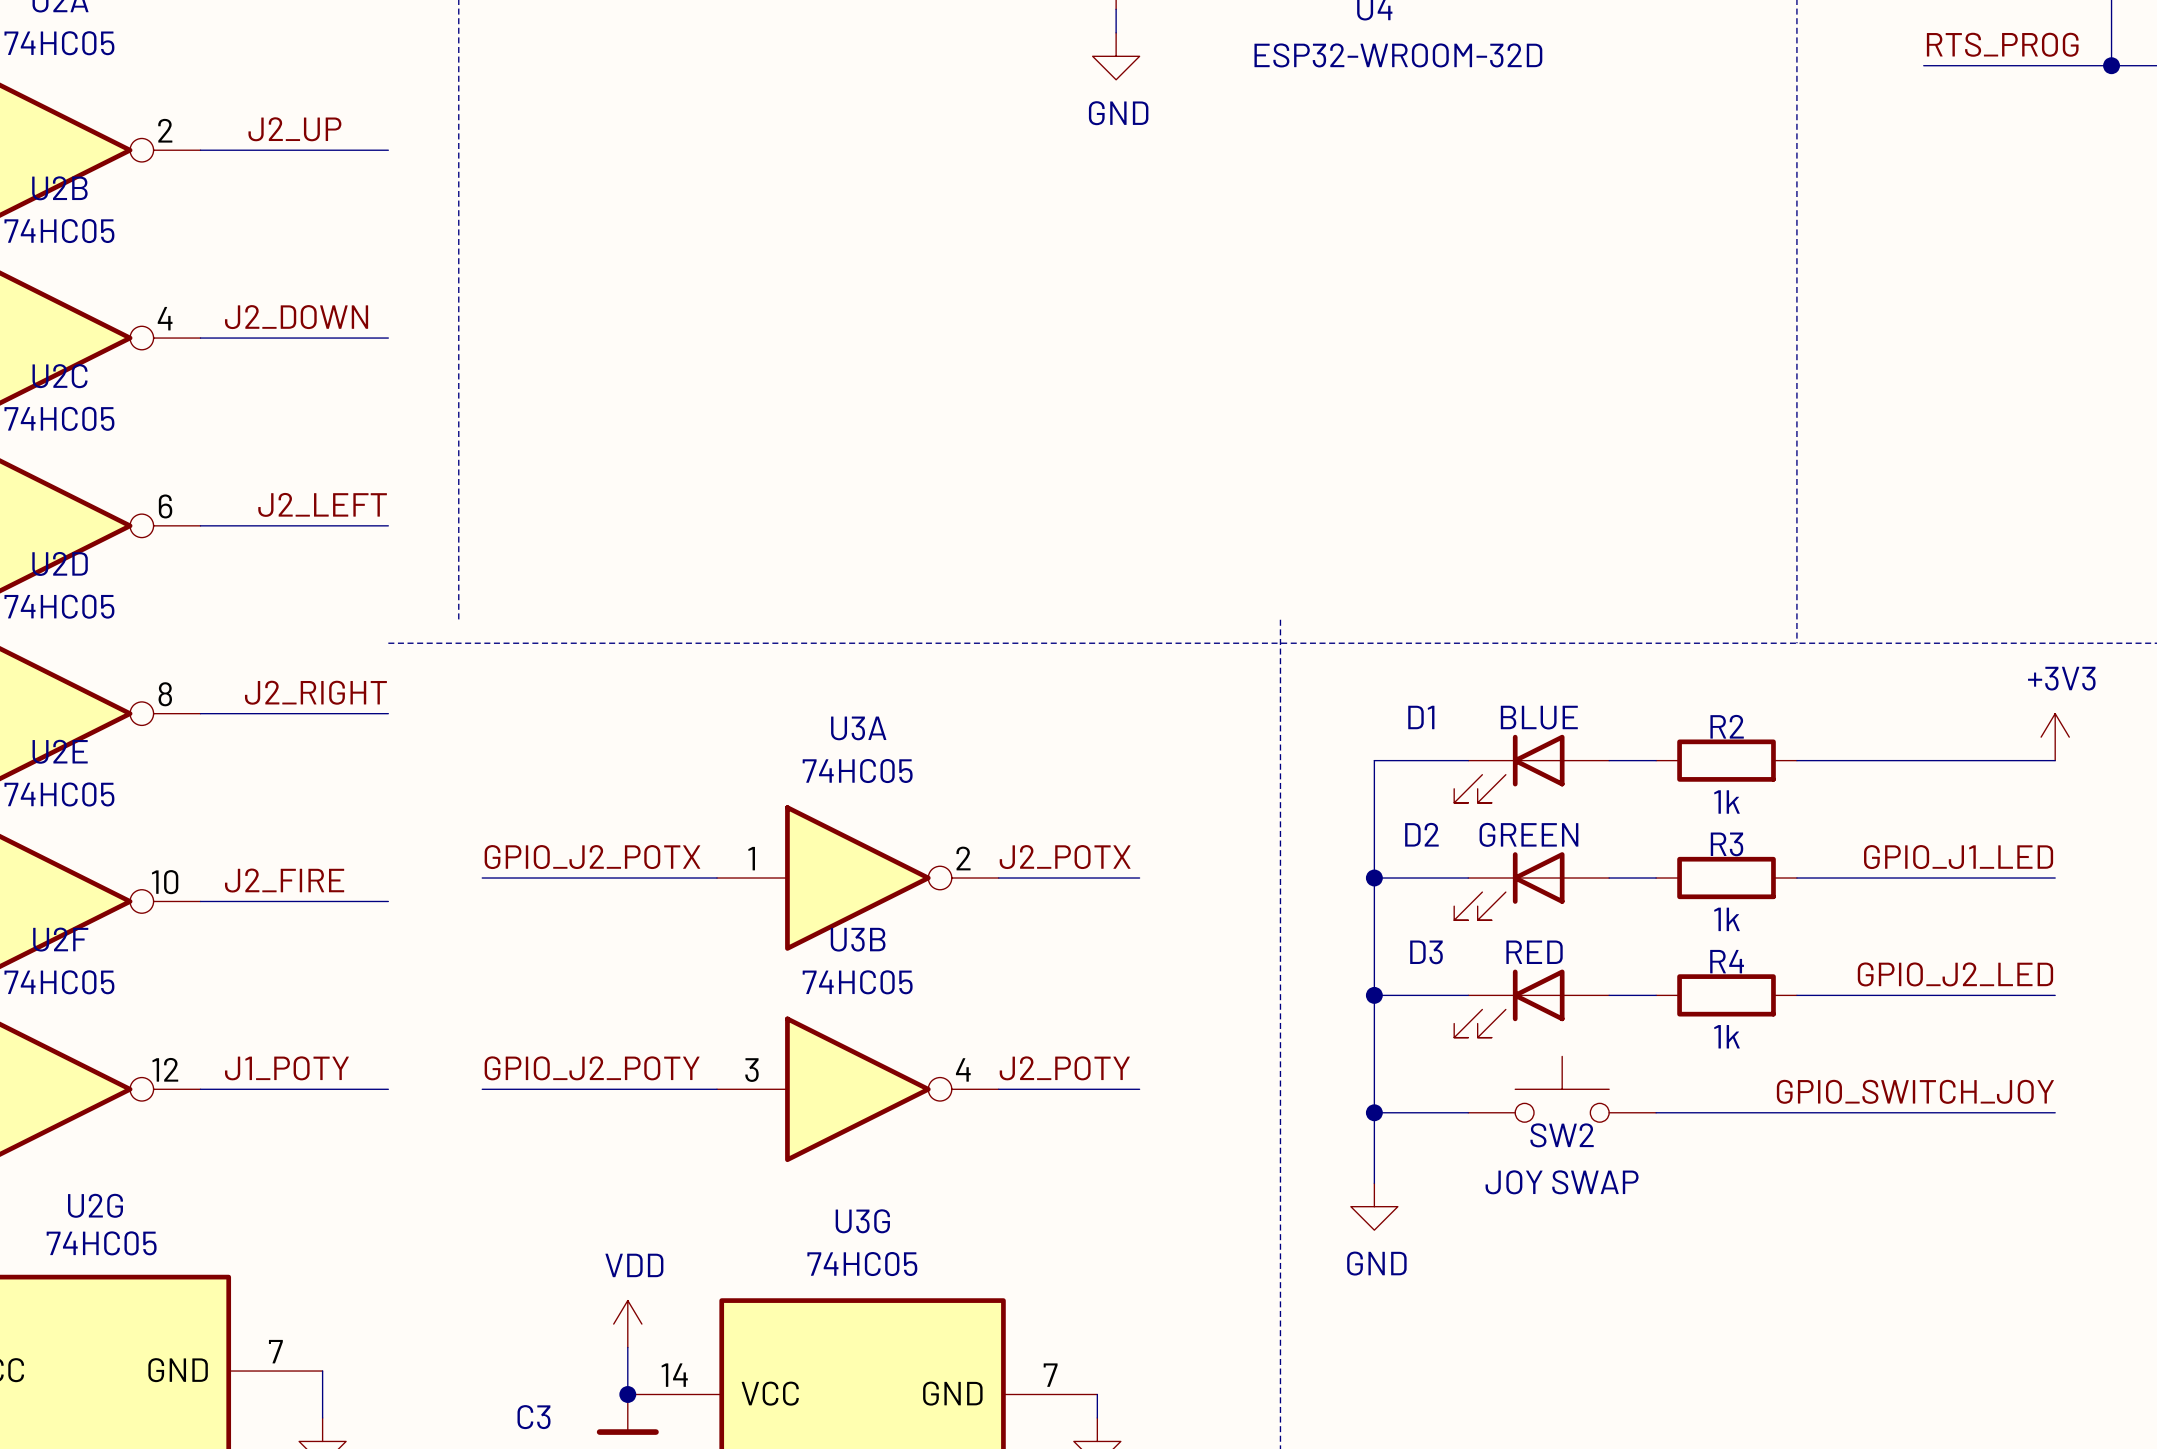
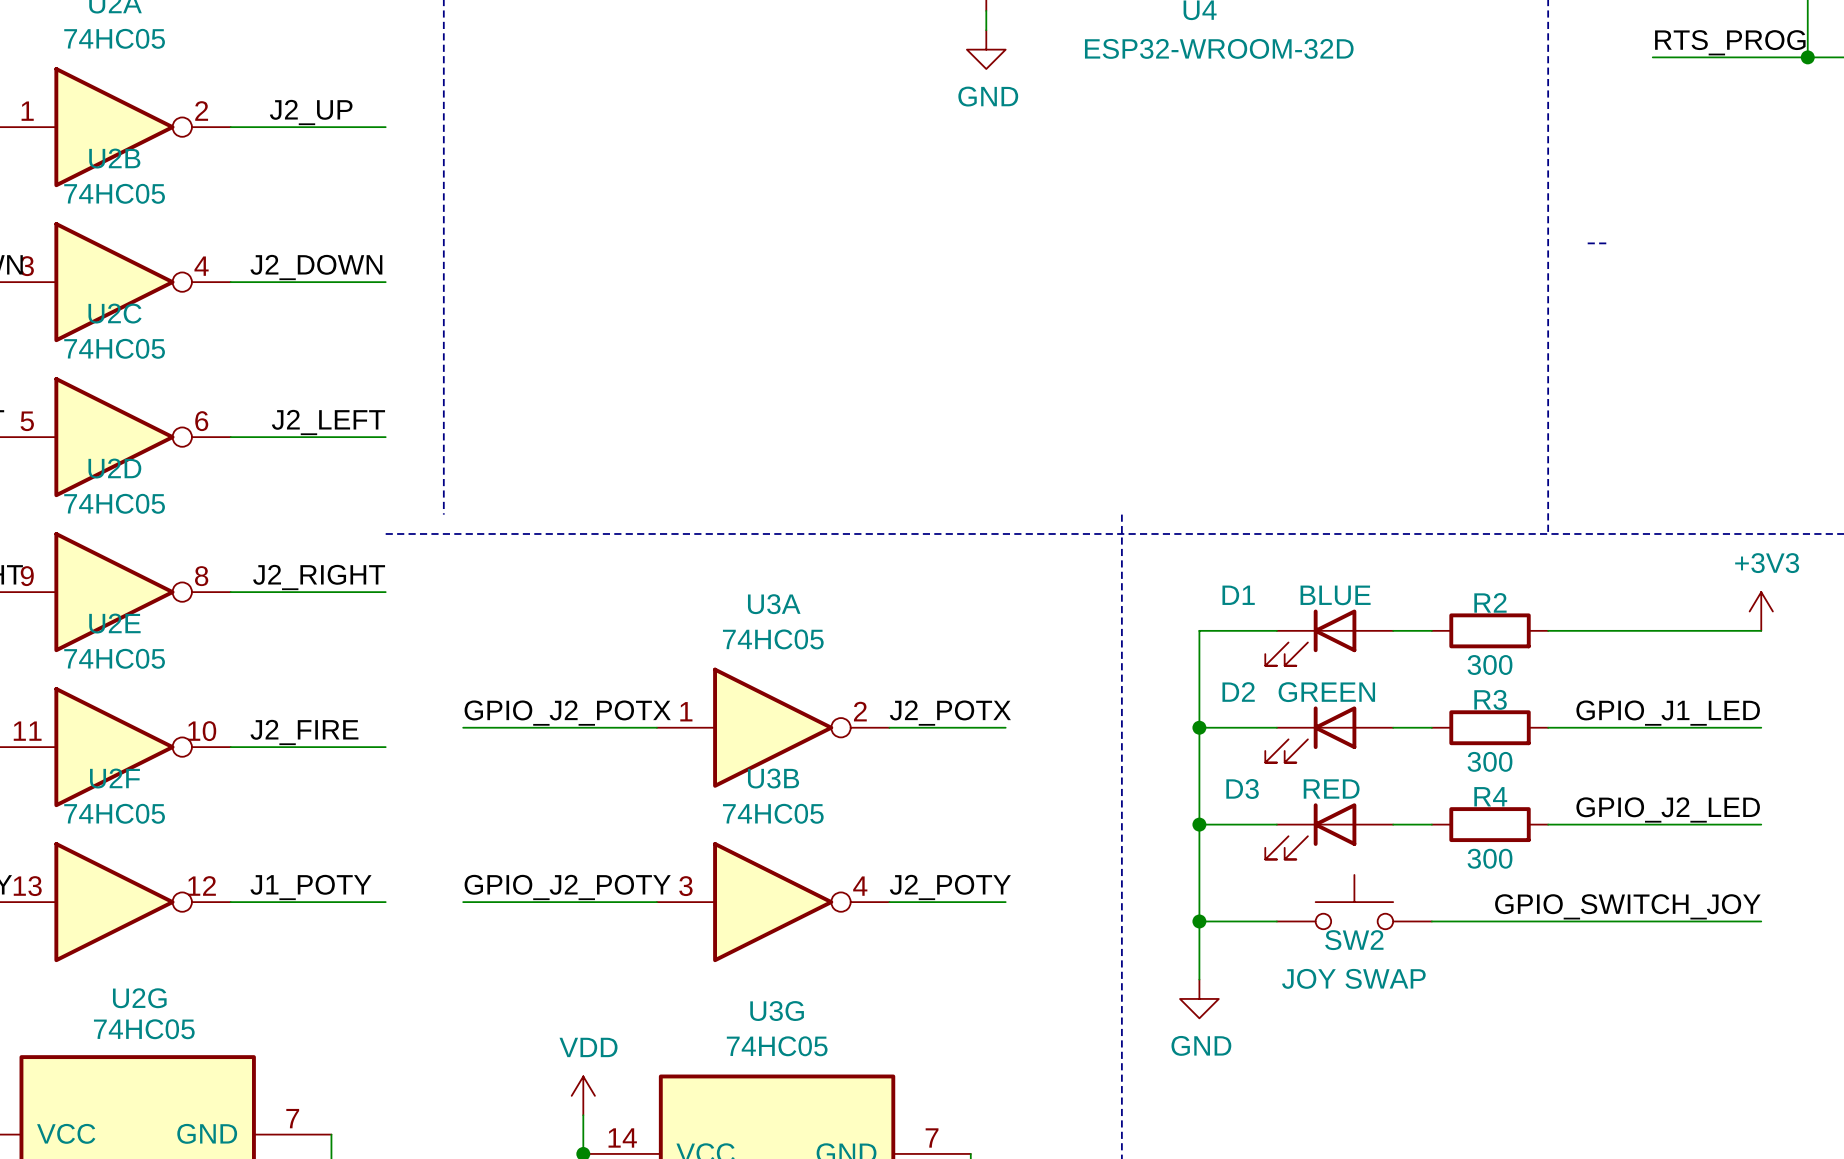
line: none -> (1586, 243) (1606, 243)
R2 value: 1k (1726, 802) -> 300 (1490, 665)
R3 value: 1k (1726, 919) -> 300 (1490, 761)
R4 value: 1k (1726, 1036) -> 300 (1490, 858)

